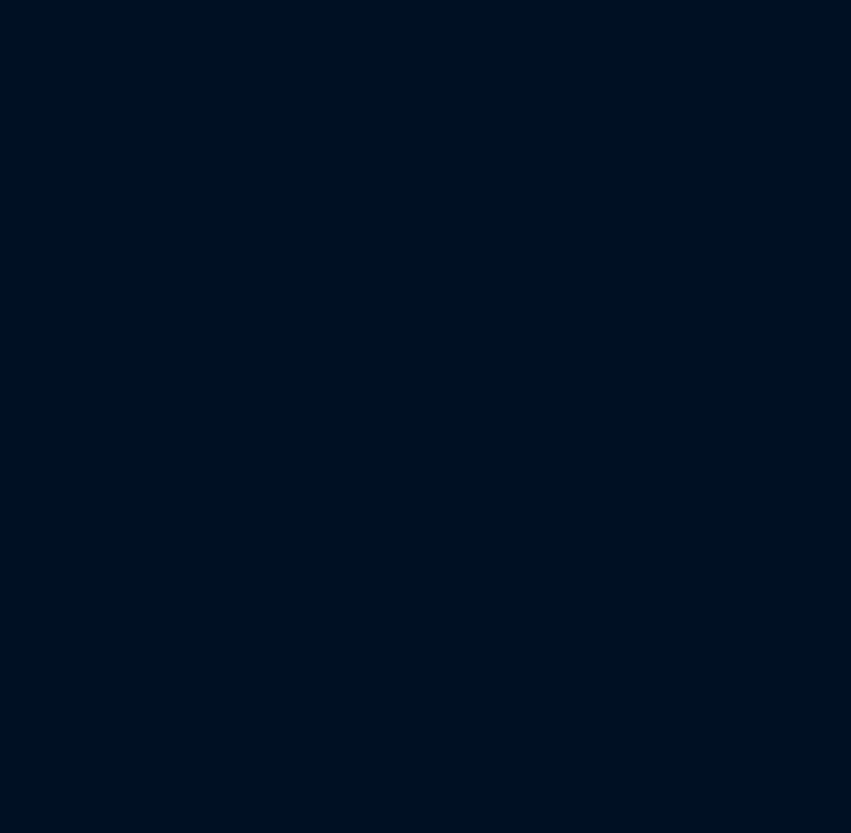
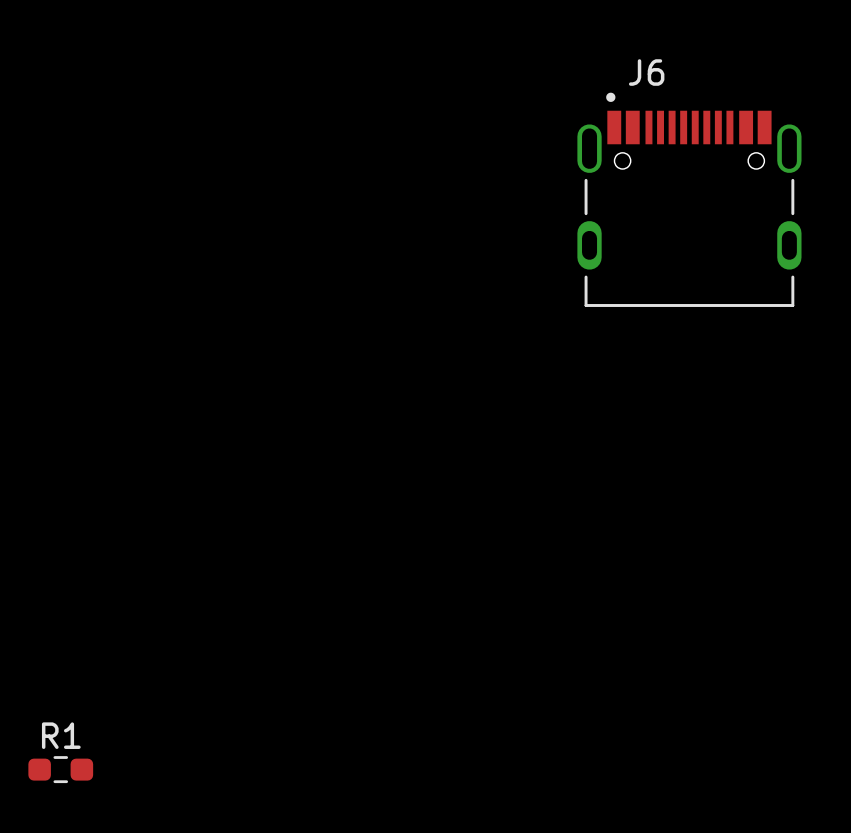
J6: none -> (689, 199)
R1: none -> (60, 769)

